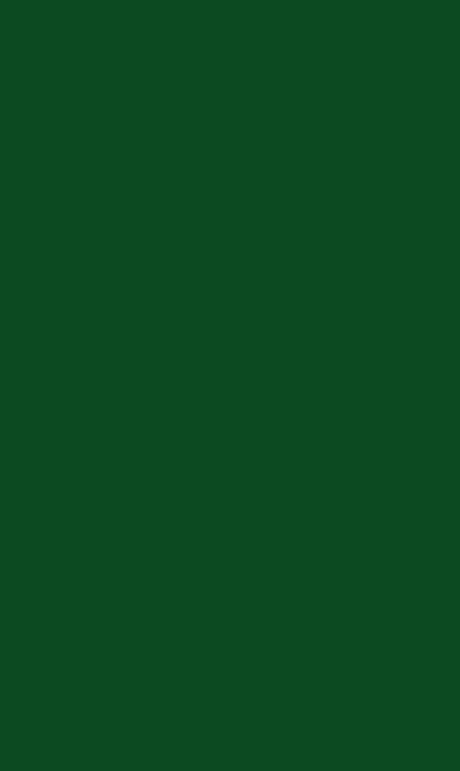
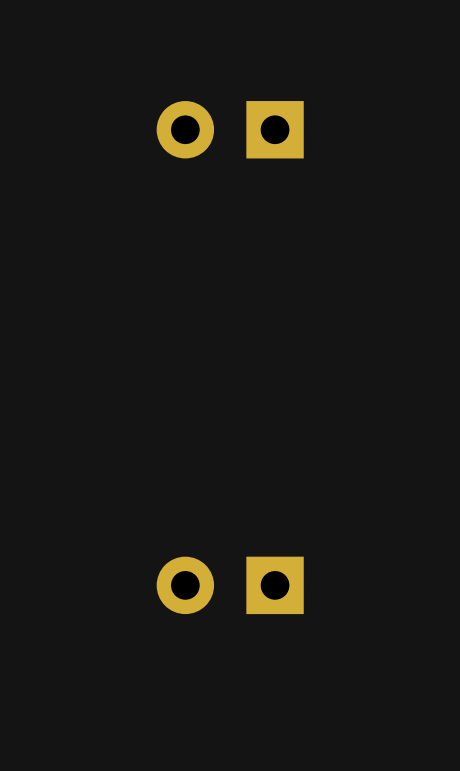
part: none -> (230, 129)
part: none -> (230, 585)

